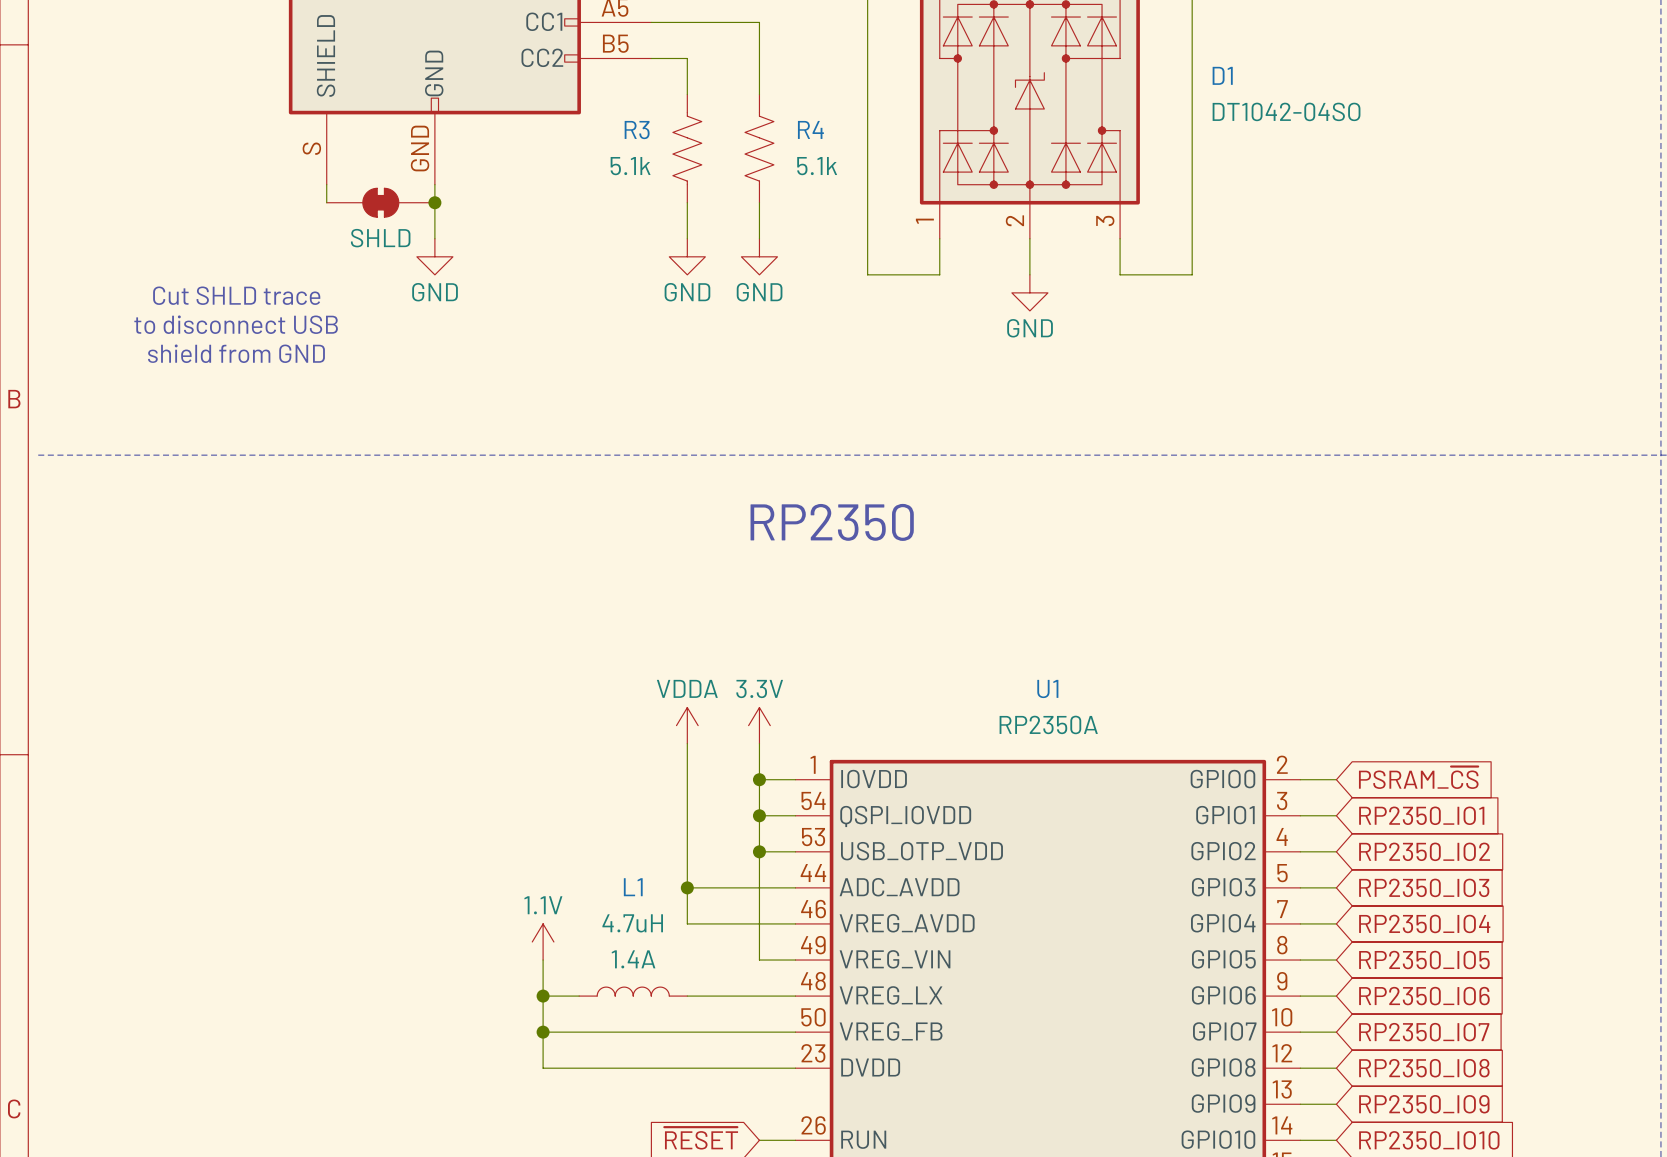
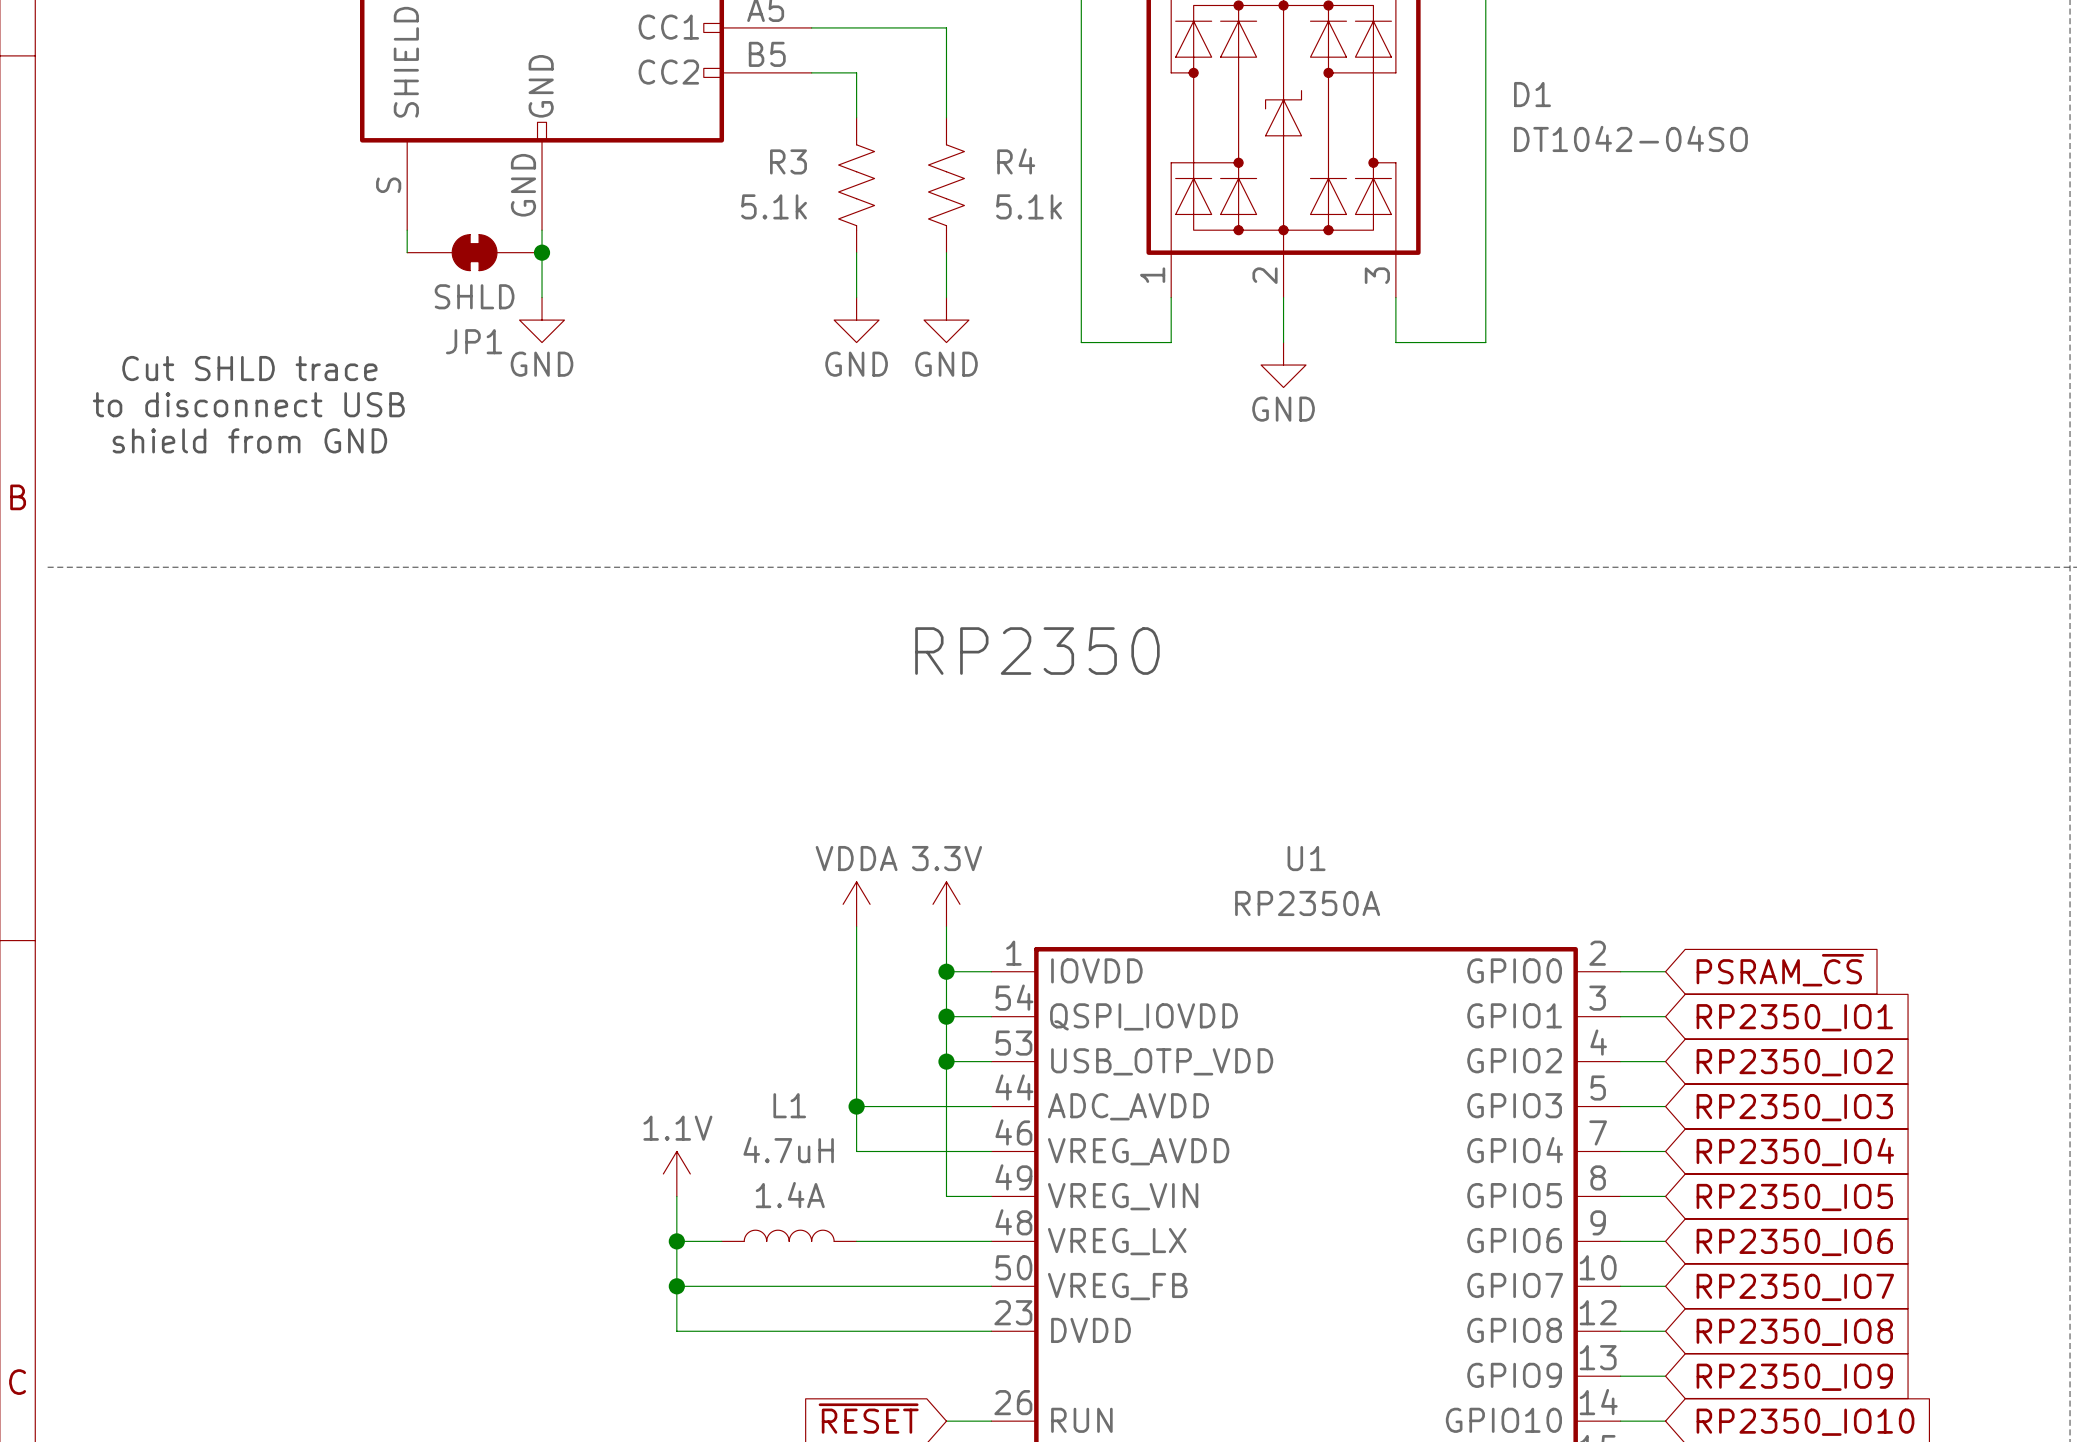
JP1 name: none -> JP1 (474, 341)
text position: Cut SHLD trace (236, 295) -> Cut SHLD trace (249, 368)
text position: to disconnect USB (236, 324) -> to disconnect USB (248, 404)
text position: shield from GND (236, 353) -> shield from GND (249, 440)

